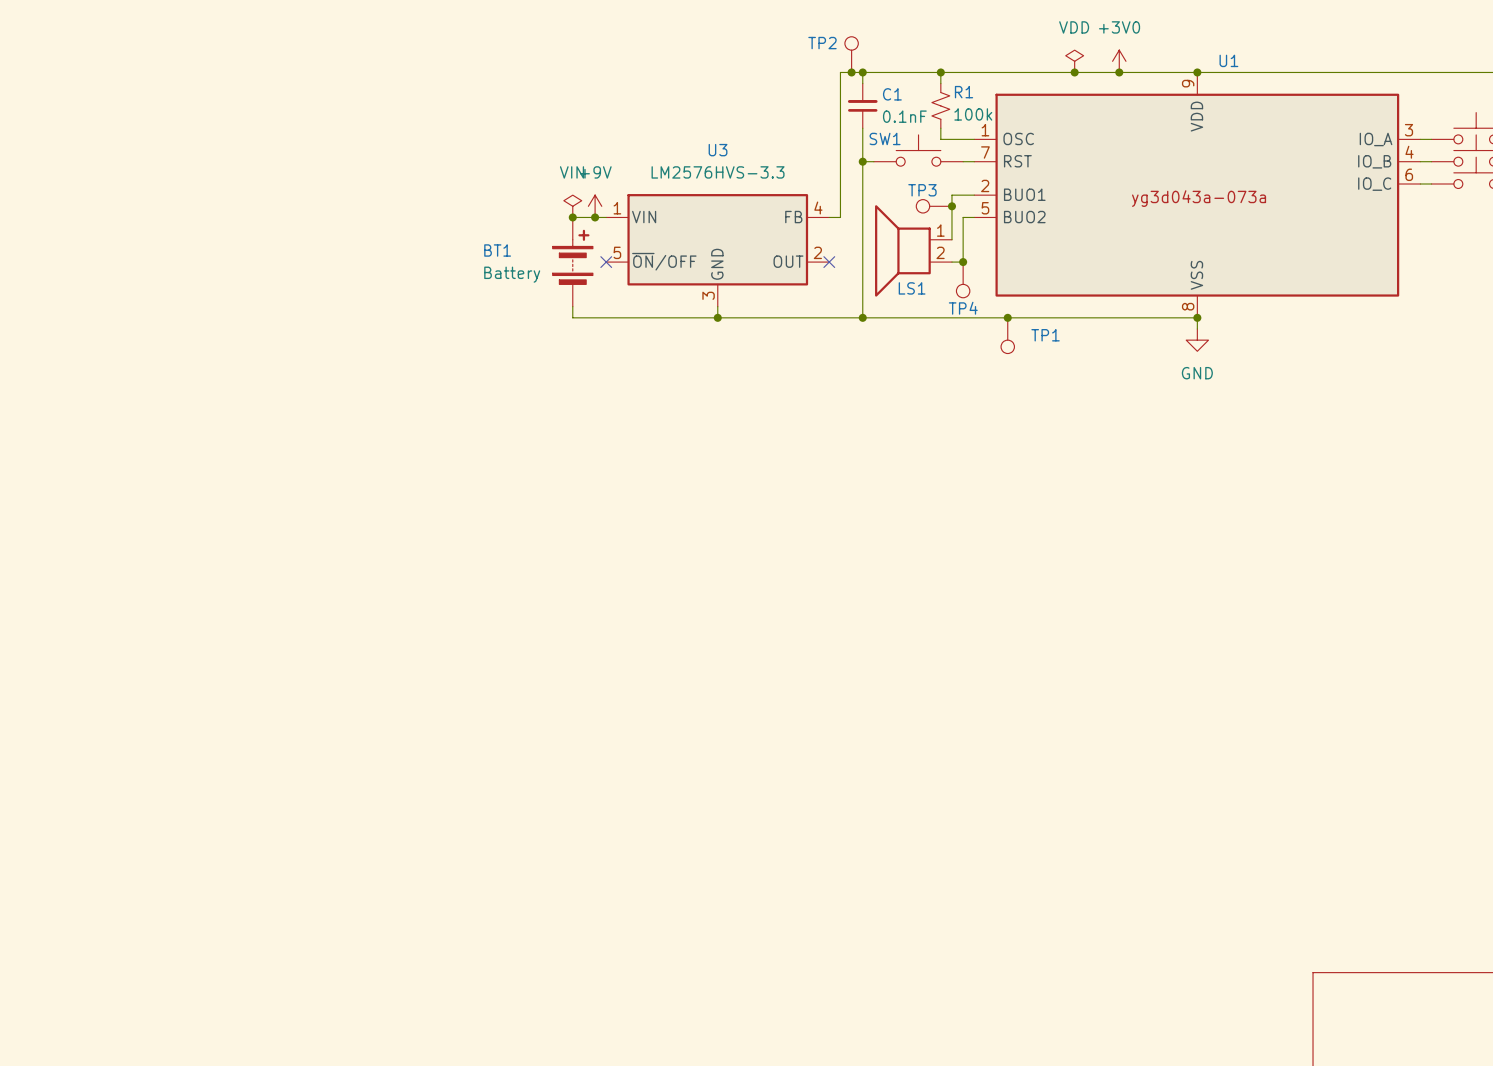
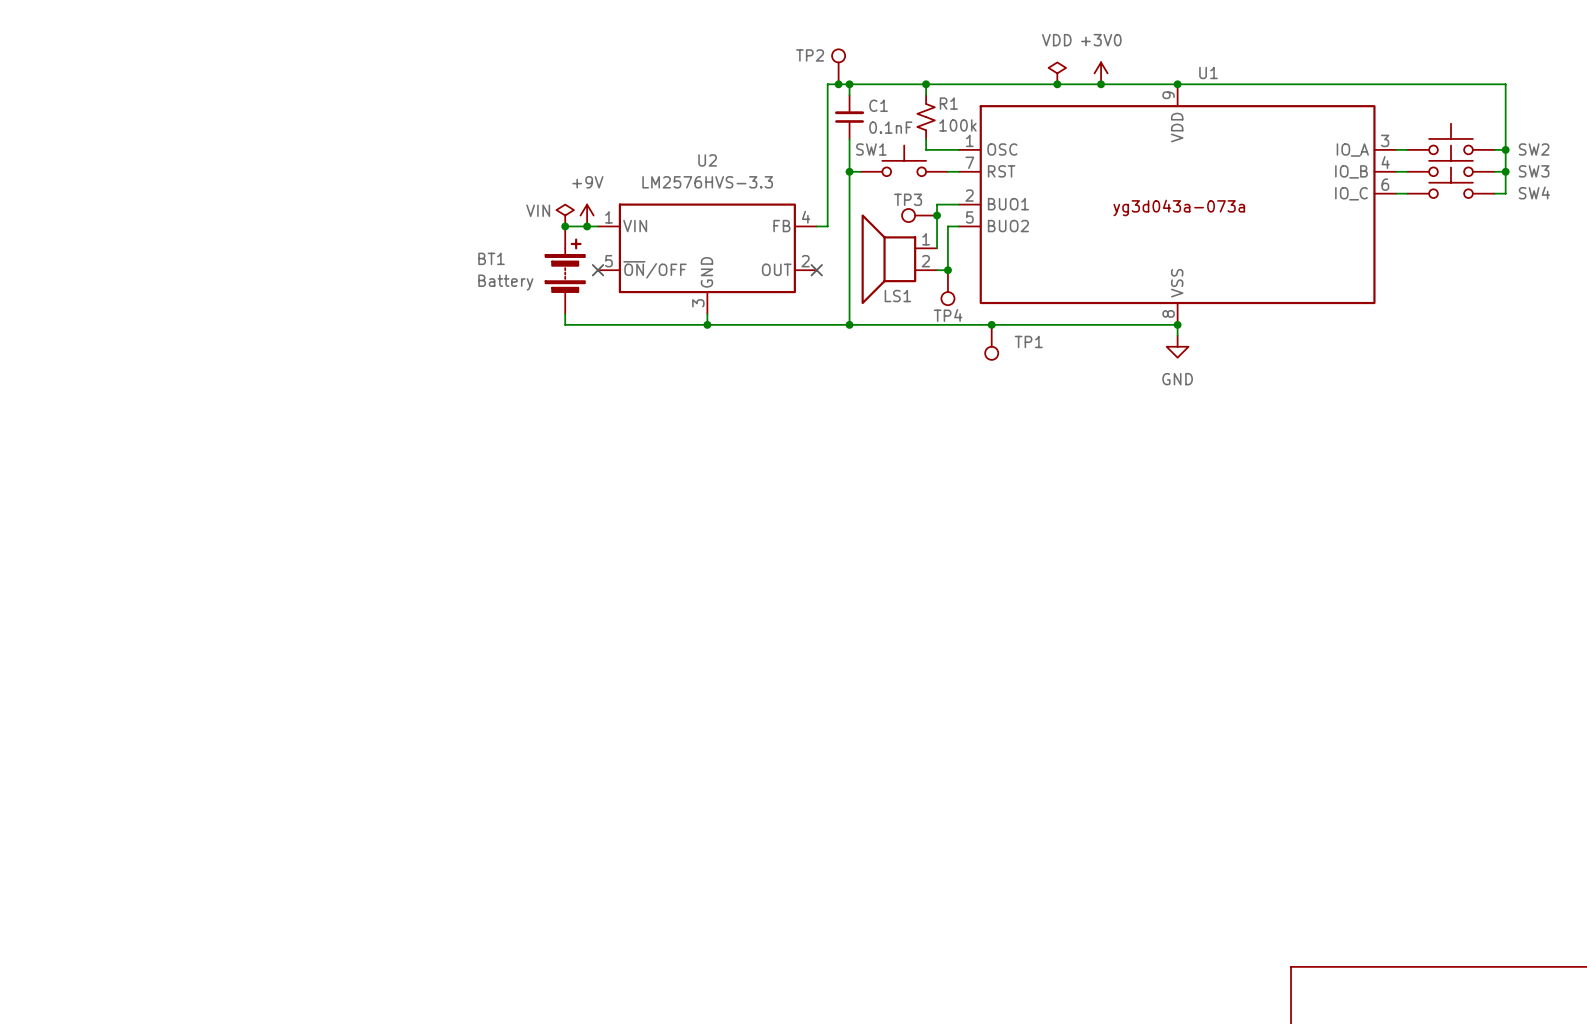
U3 name: U3 (718, 150) -> U2 (707, 160)
power symbol text position: VIN (571, 172) -> VIN (538, 210)

